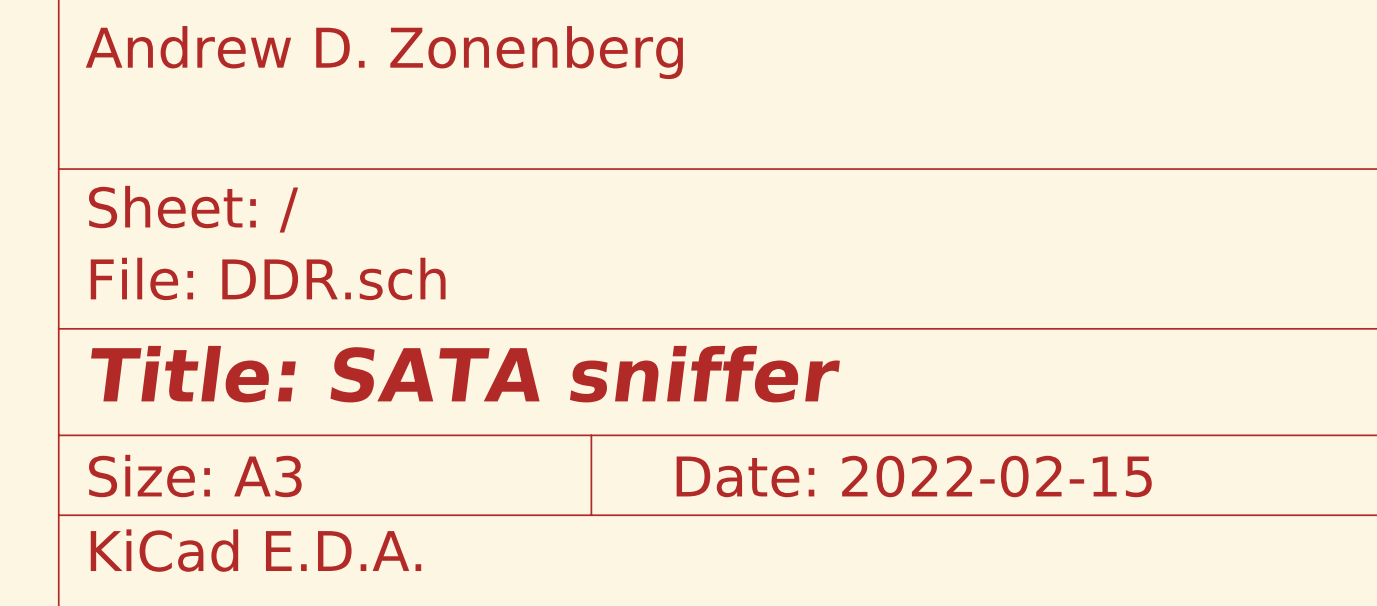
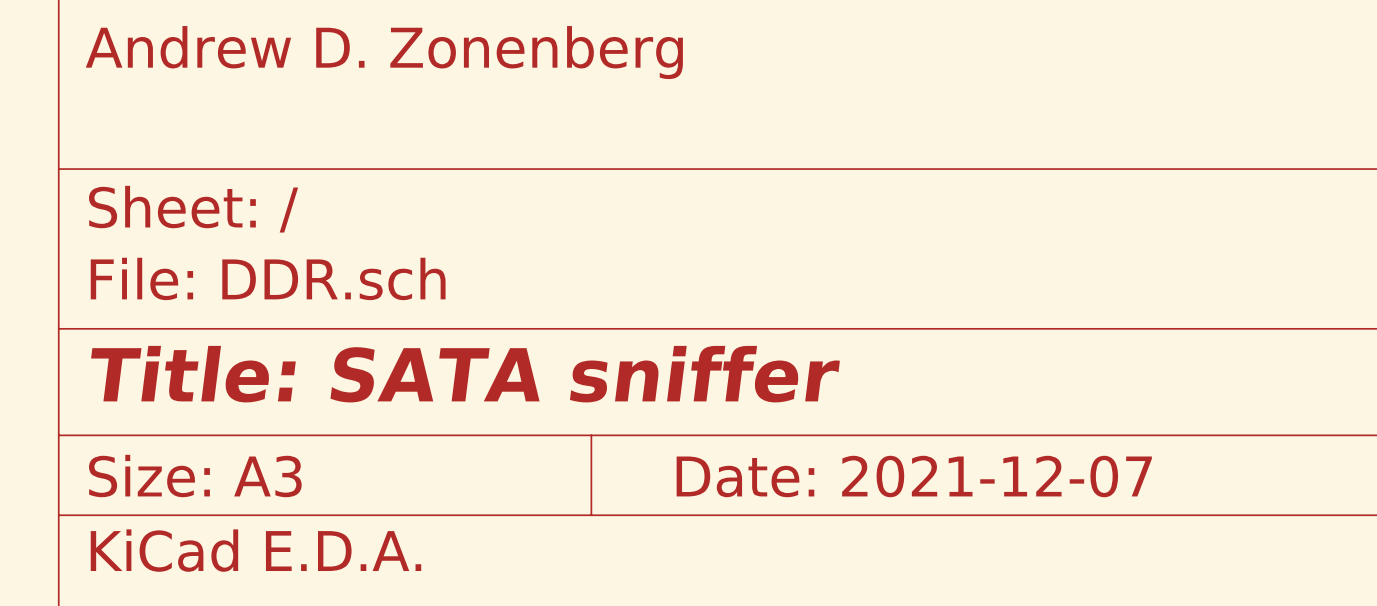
title block: Date: 2022-02-15 (914, 476) -> Date: 2021-12-07 (914, 476)

